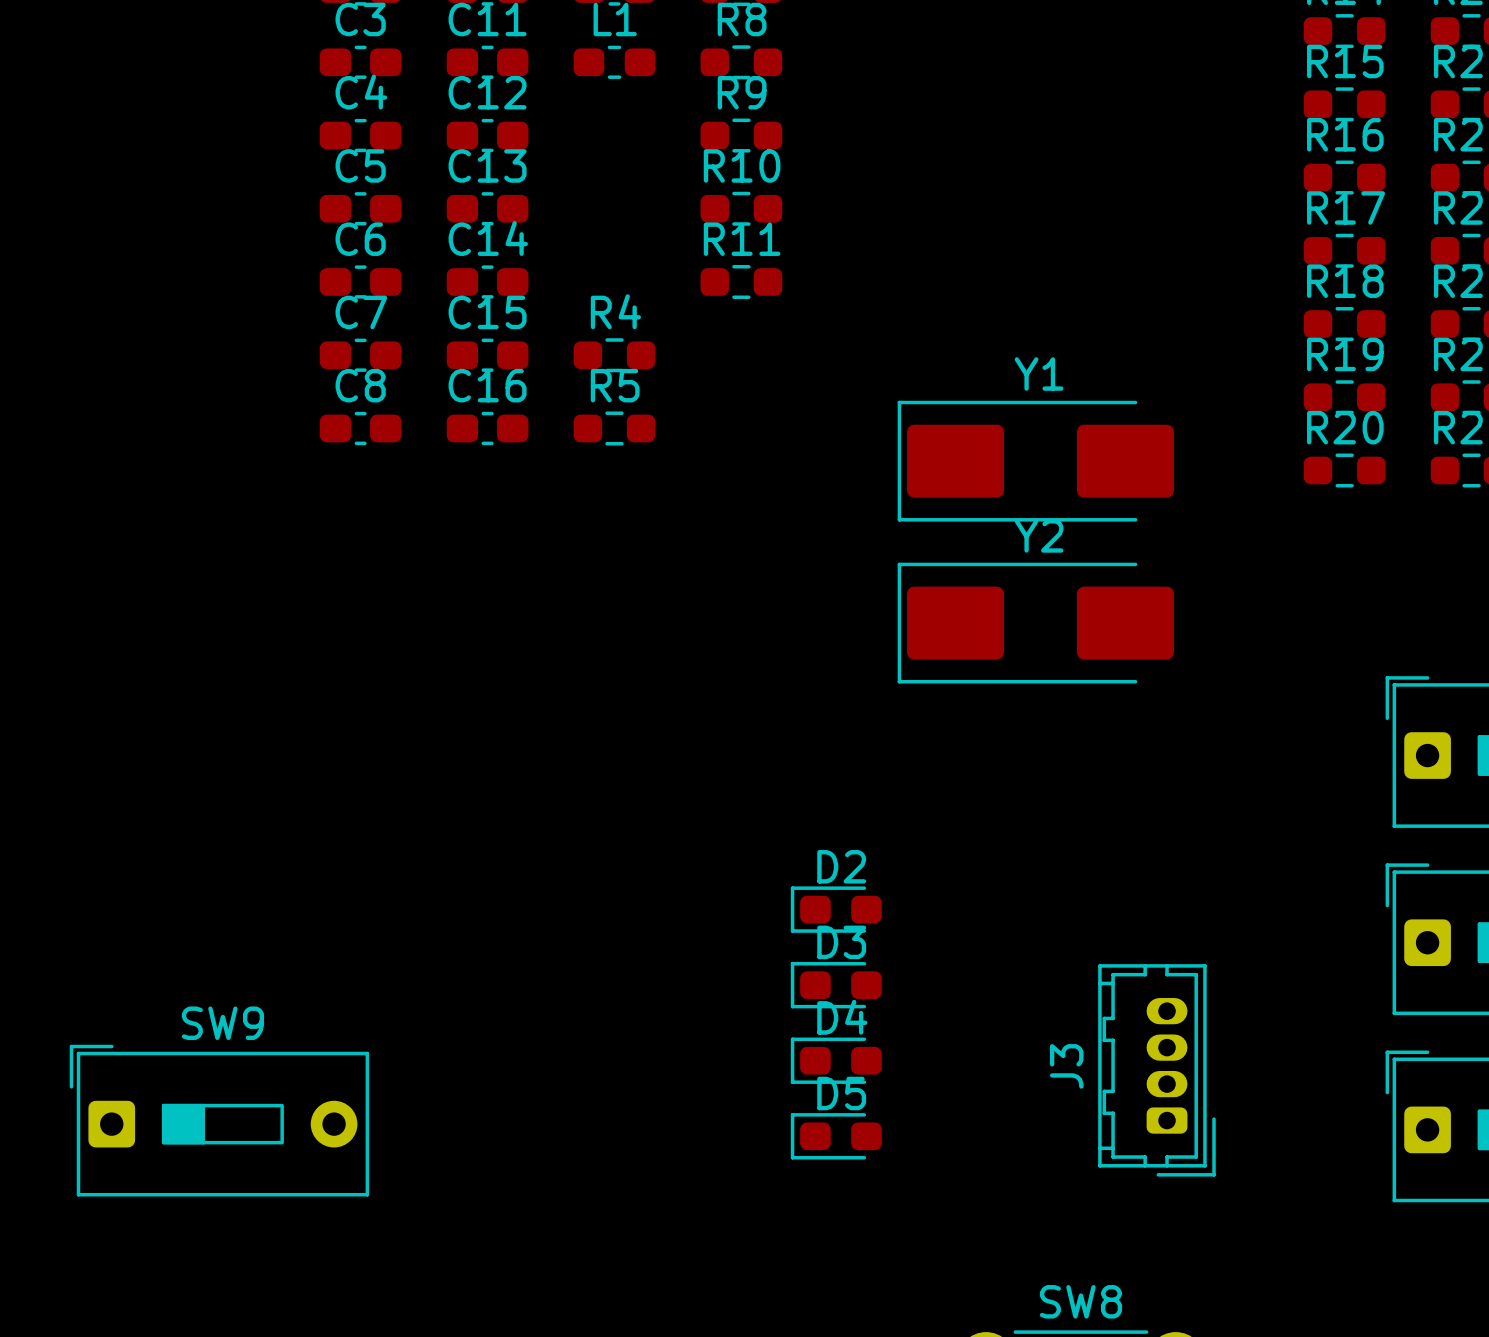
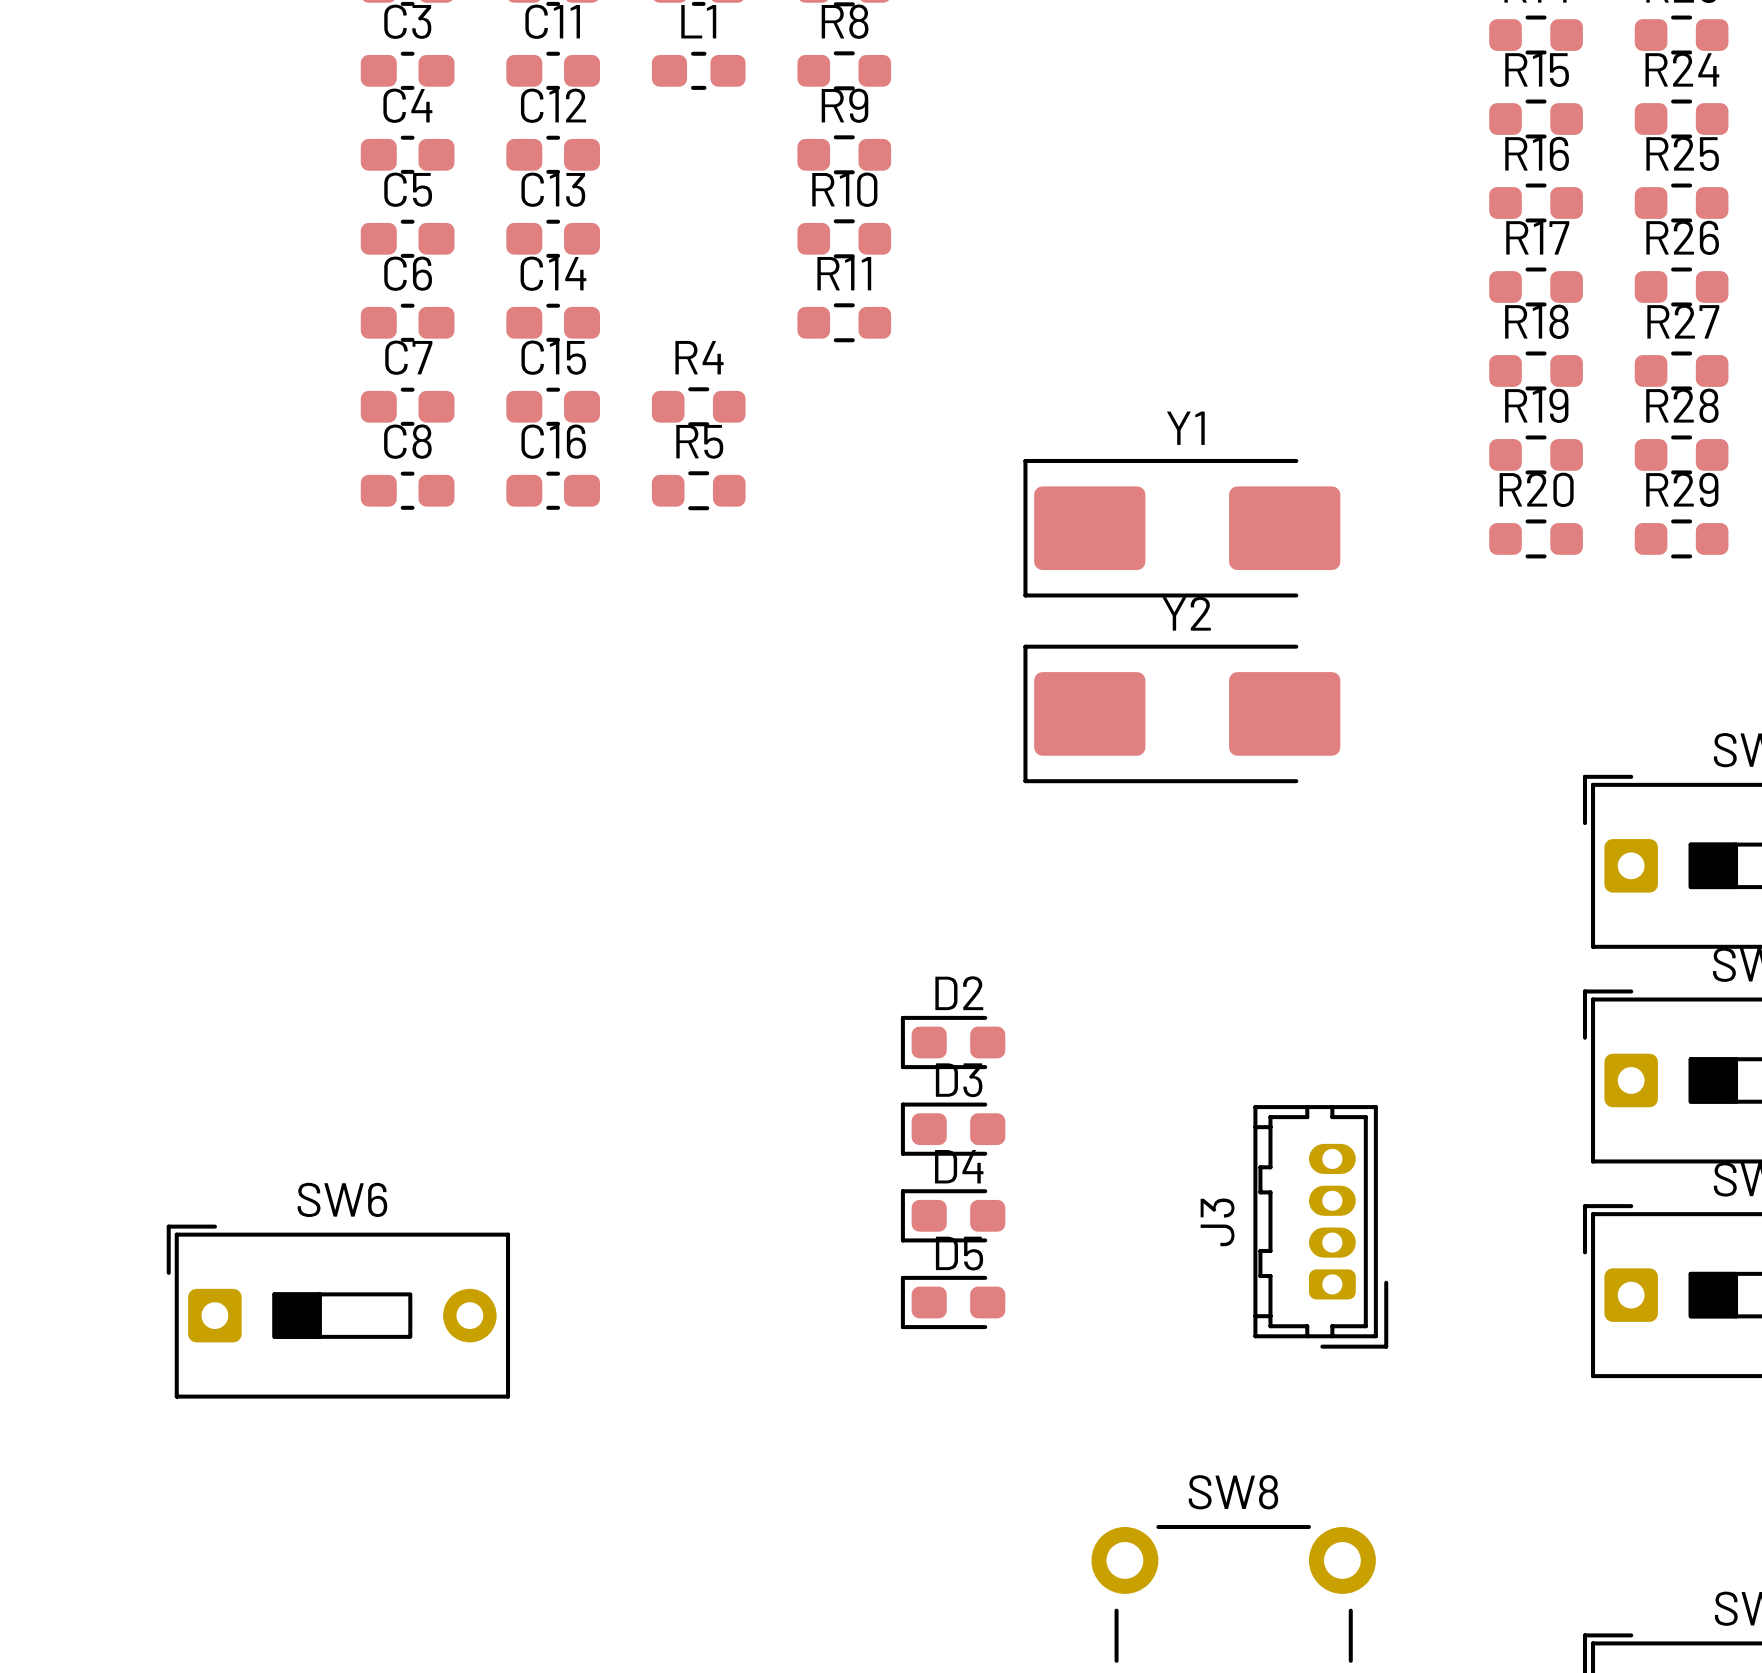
SW9: (219, 1120) -> none
SW6: none -> (338, 1311)

